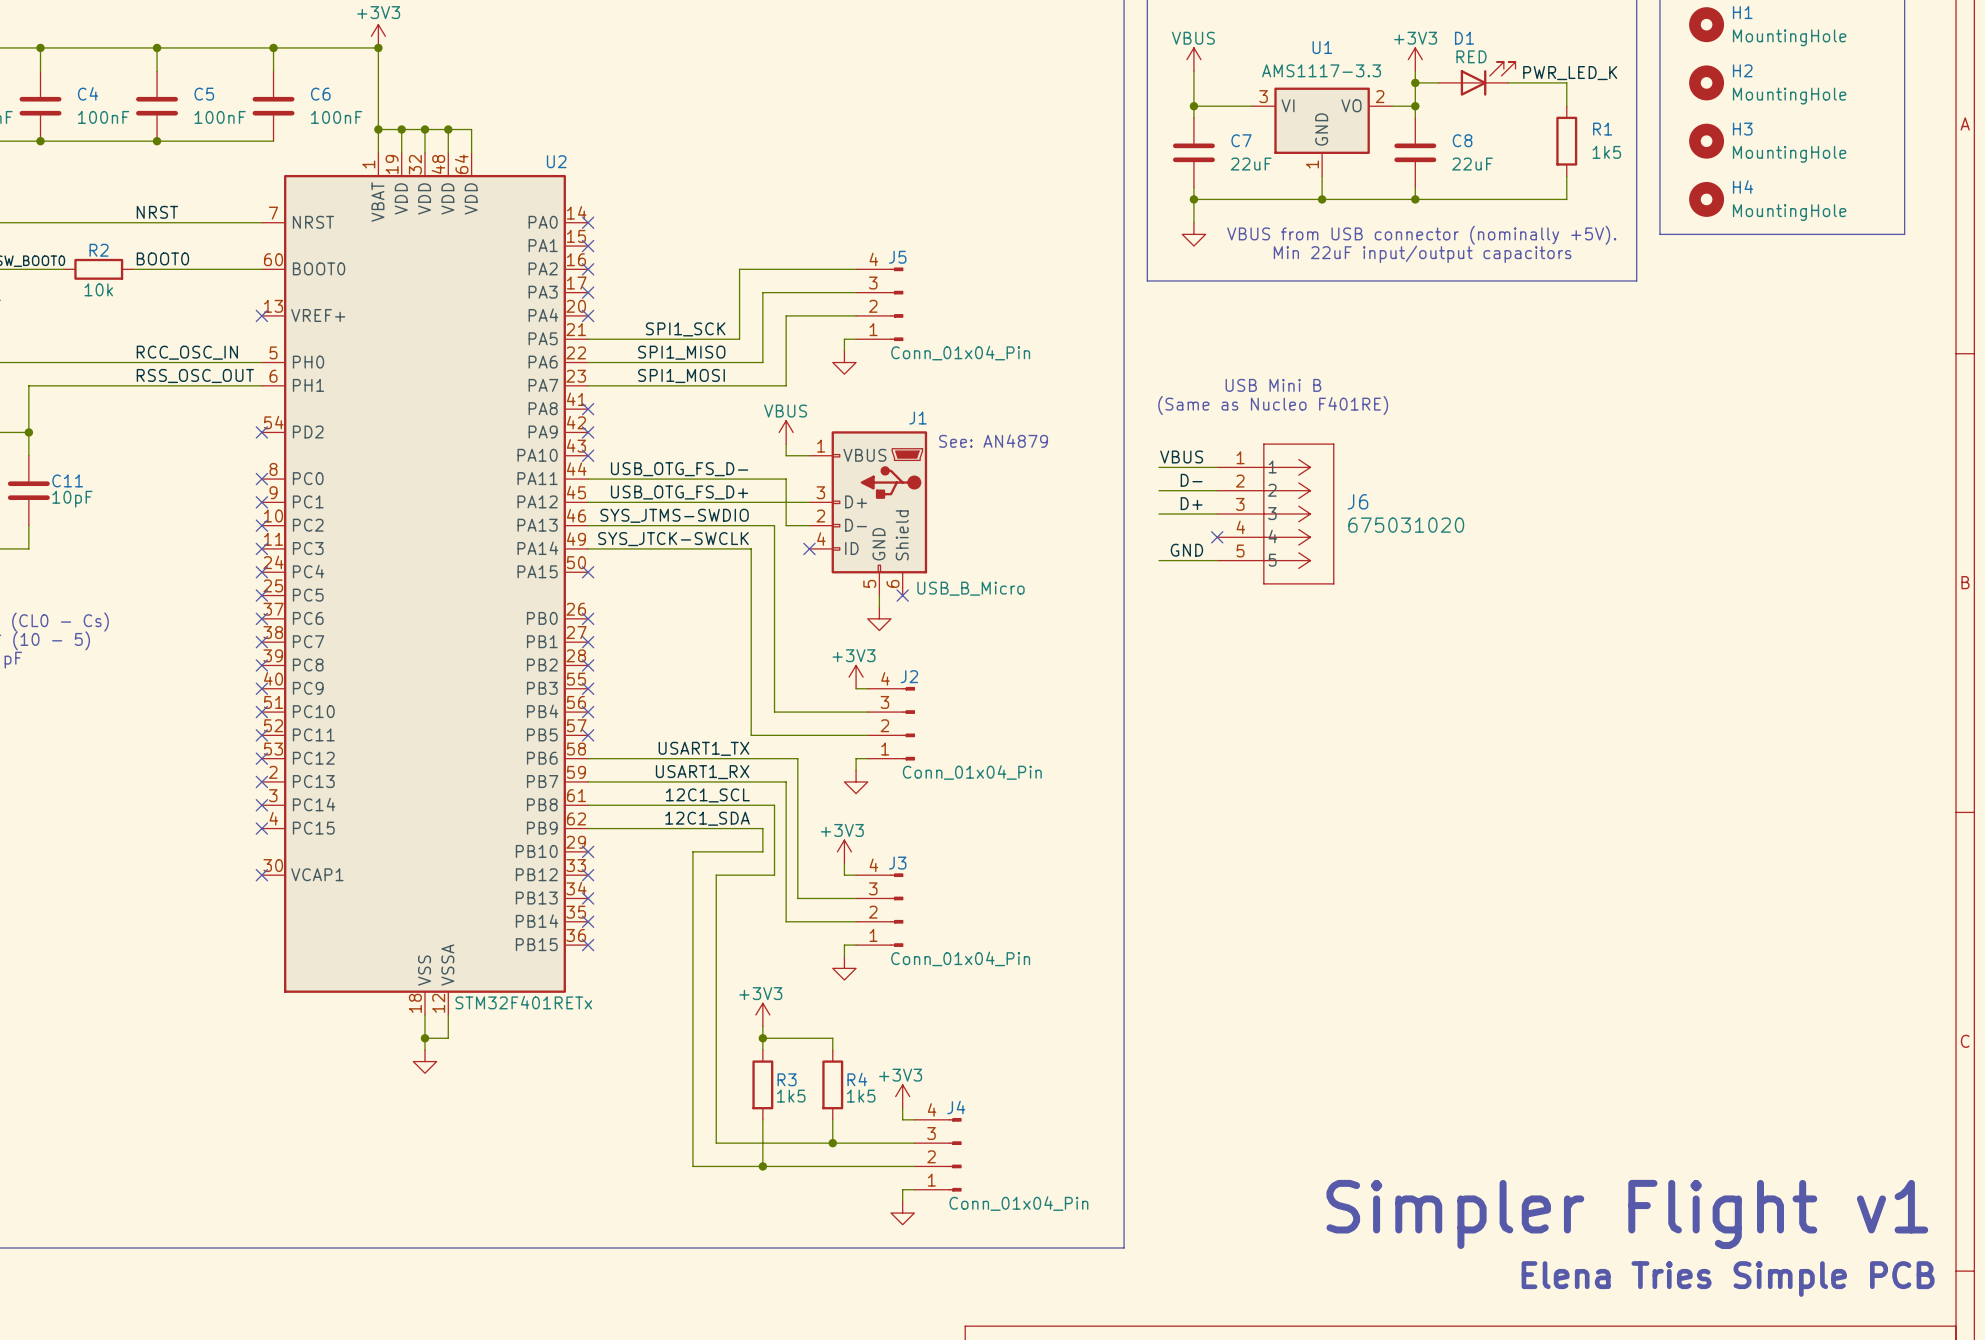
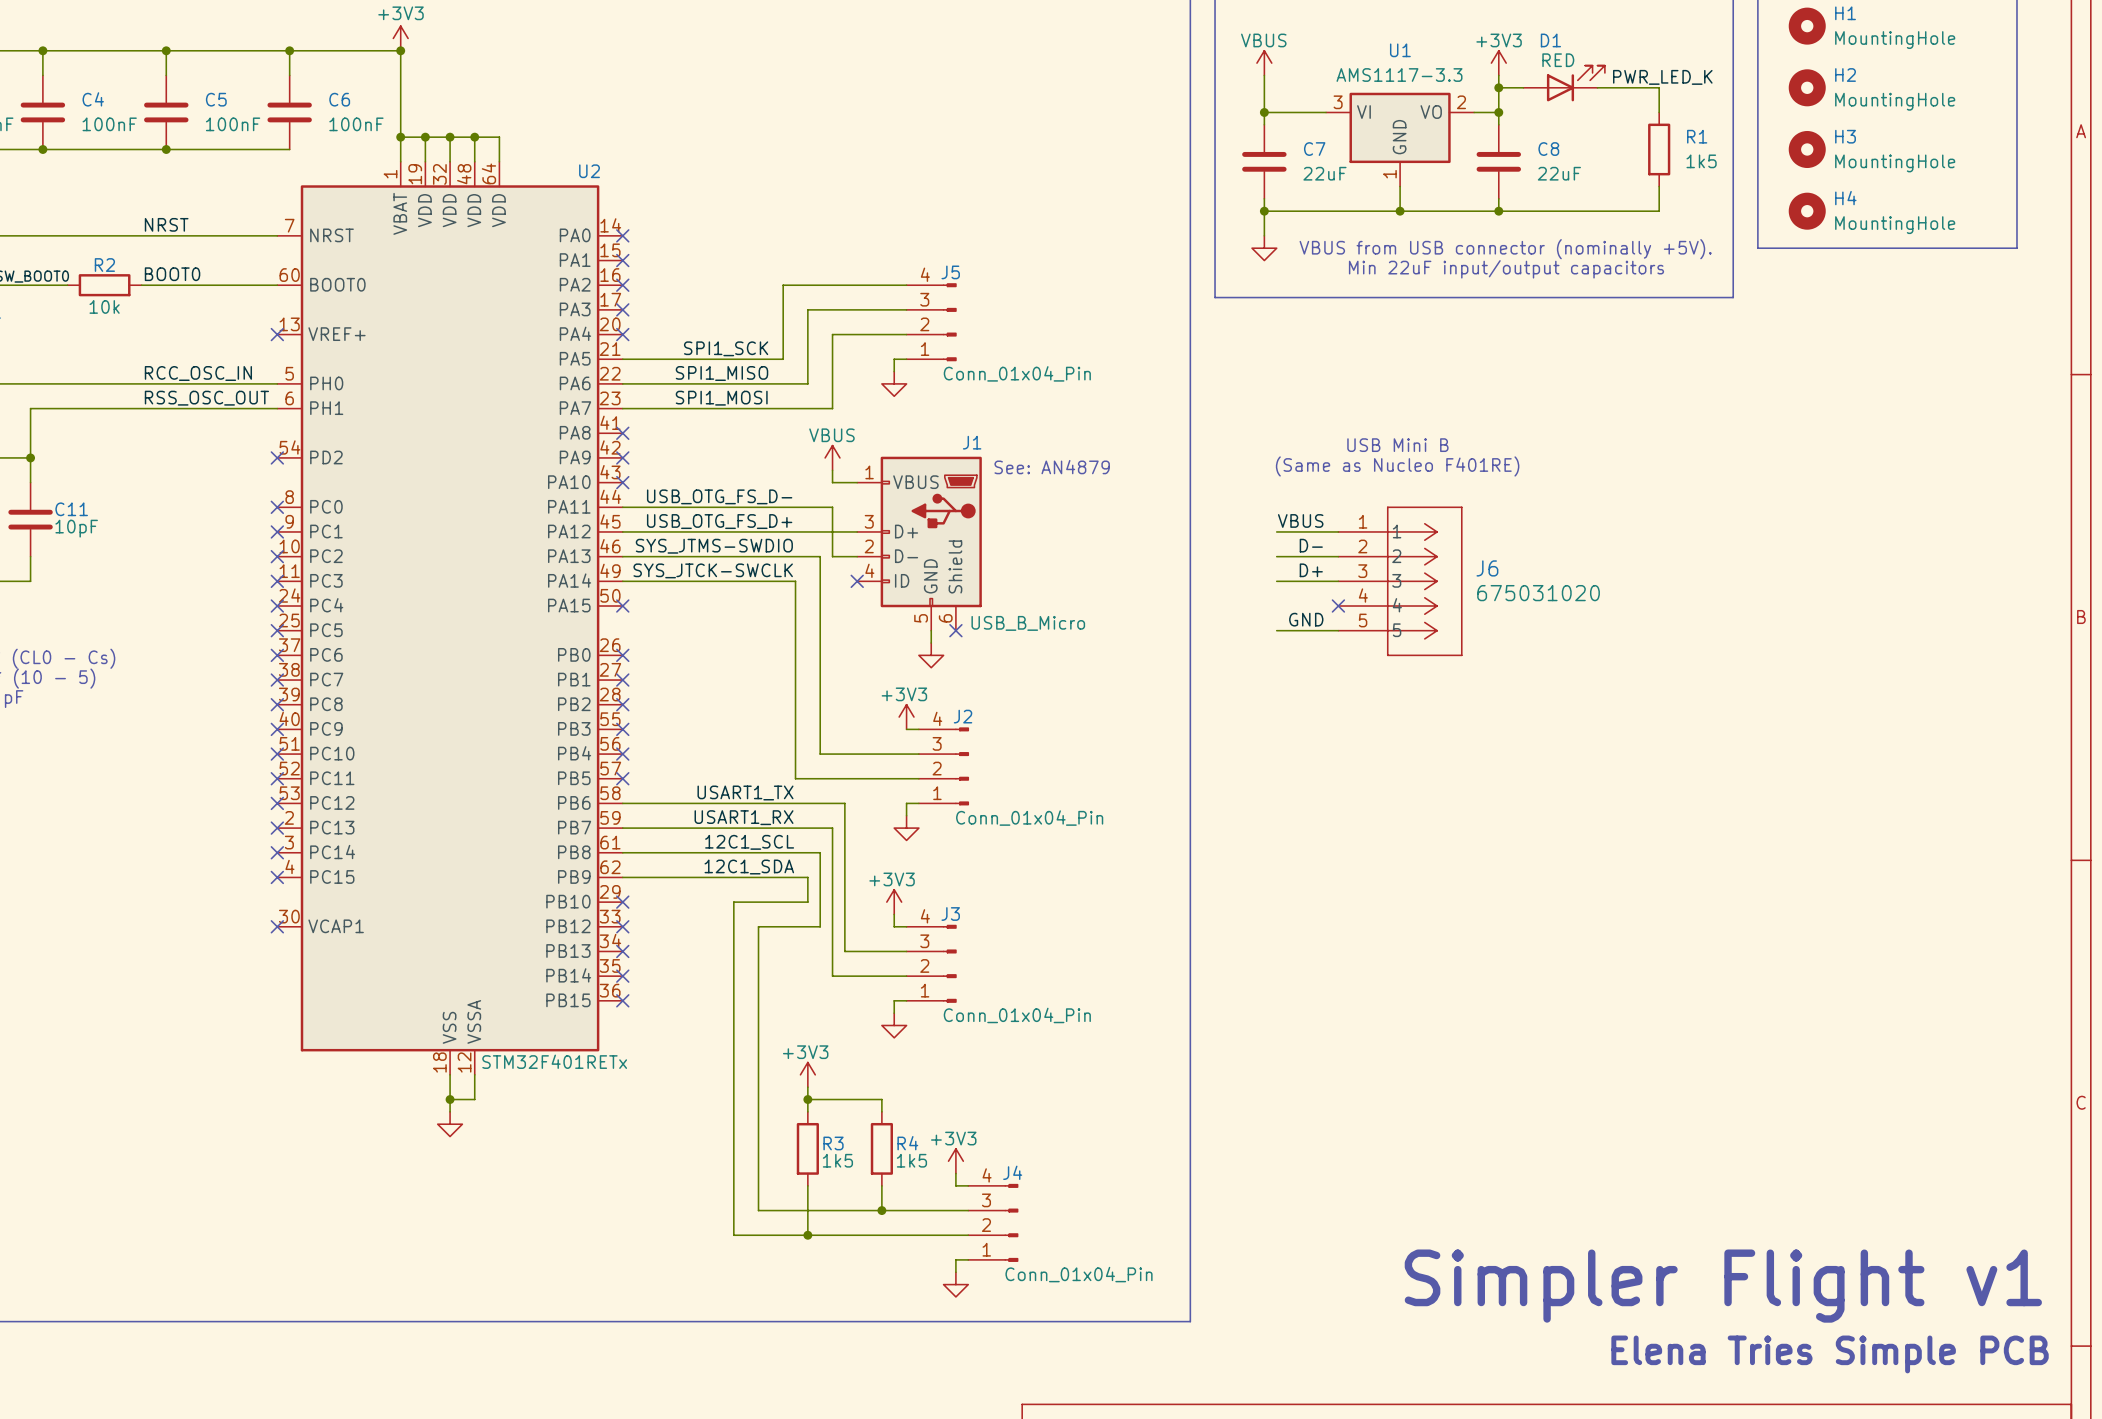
text position: USB Mini B (1273, 385) -> USB Mini B (1397, 445)
text position: (Same as Nucleo F401RE) (1273, 405) -> (Same as Nucleo F401RE) (1397, 466)
label position: VBUS (1181, 456) -> VBUS (1300, 520)
wire: (1158, 467) (1217, 467) -> (1276, 531) (1338, 531)
label position: D- (1191, 480) -> D- (1311, 545)
wire: (1158, 490) (1217, 490) -> (1276, 556) (1338, 556)
label position: D+ (1191, 503) -> D+ (1311, 570)
wire: (1158, 513) (1217, 513) -> (1276, 581) (1338, 581)
J6 position: (1275, 513) -> (1400, 581)
no-connect mark: (1217, 537) -> none
label position: GND (1186, 550) -> GND (1306, 619)
wire: (1158, 560) (1217, 560) -> (1276, 630) (1338, 630)
no-connect mark: none -> (1338, 606)

